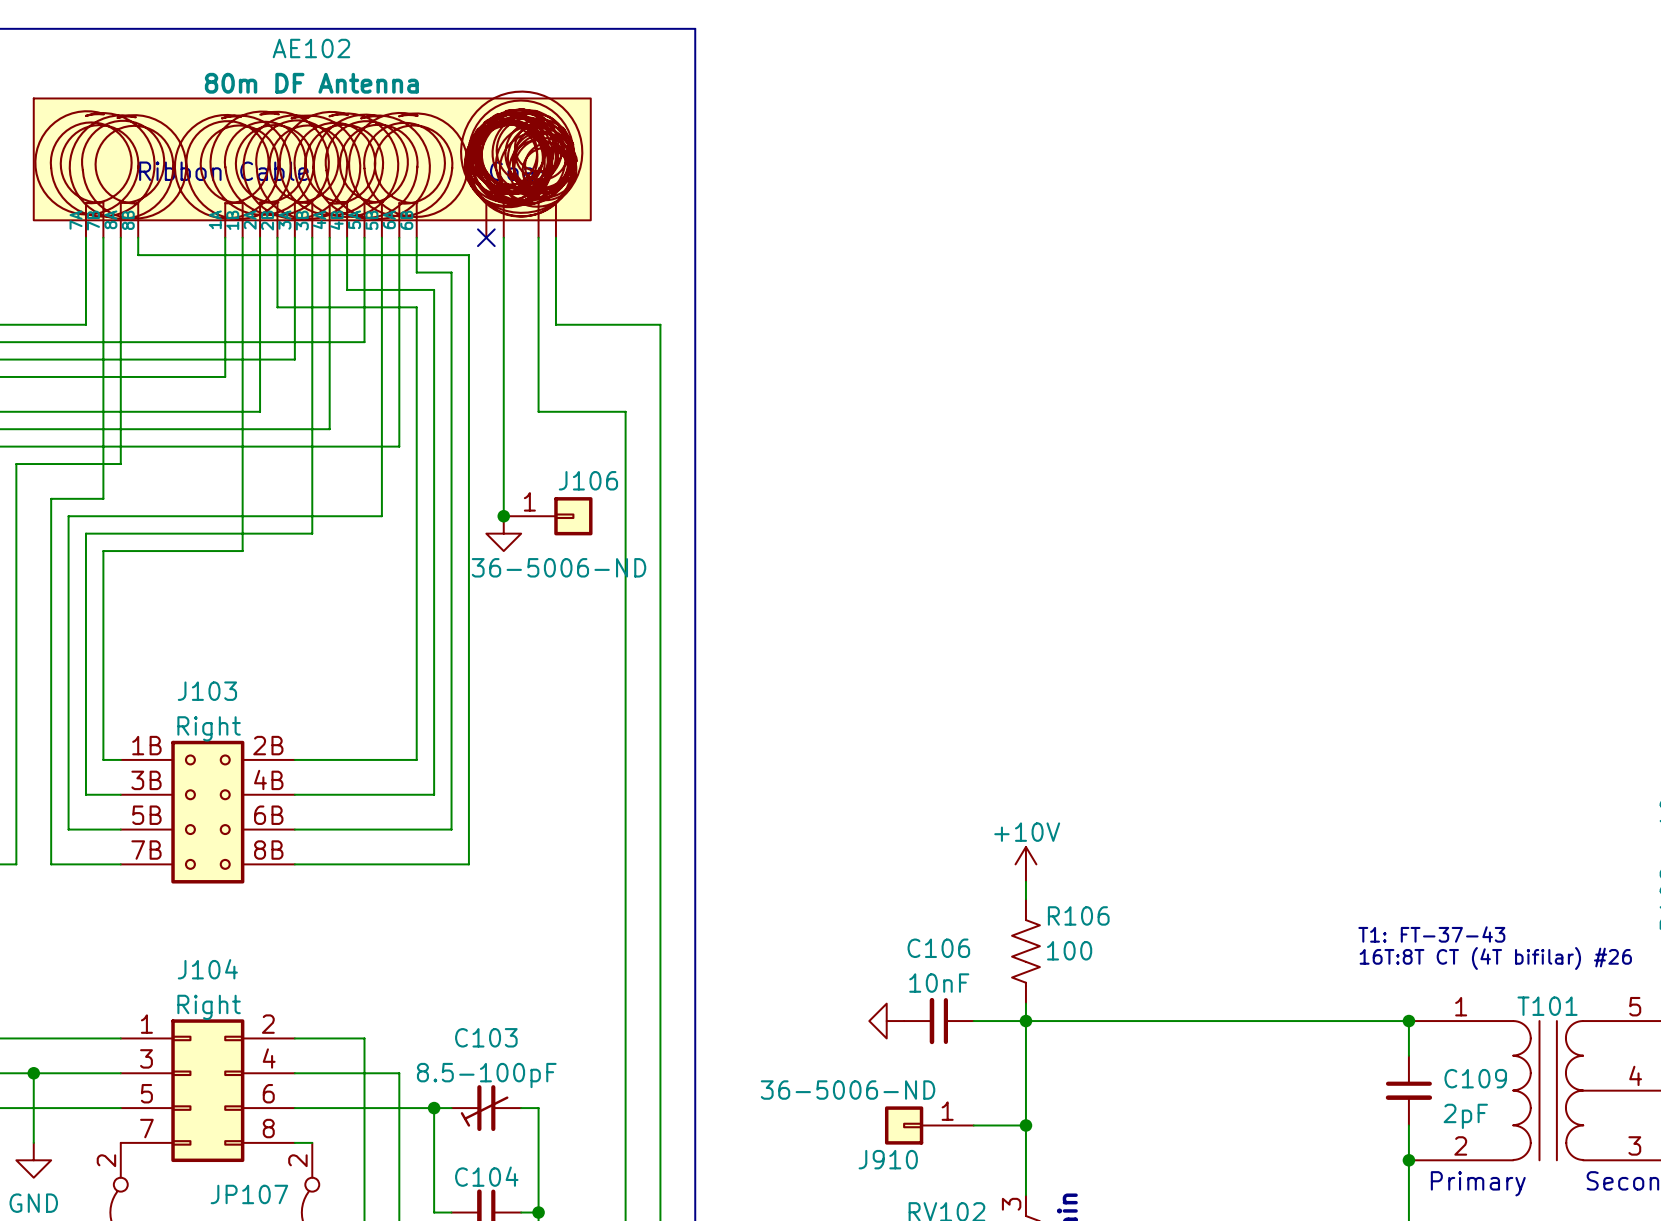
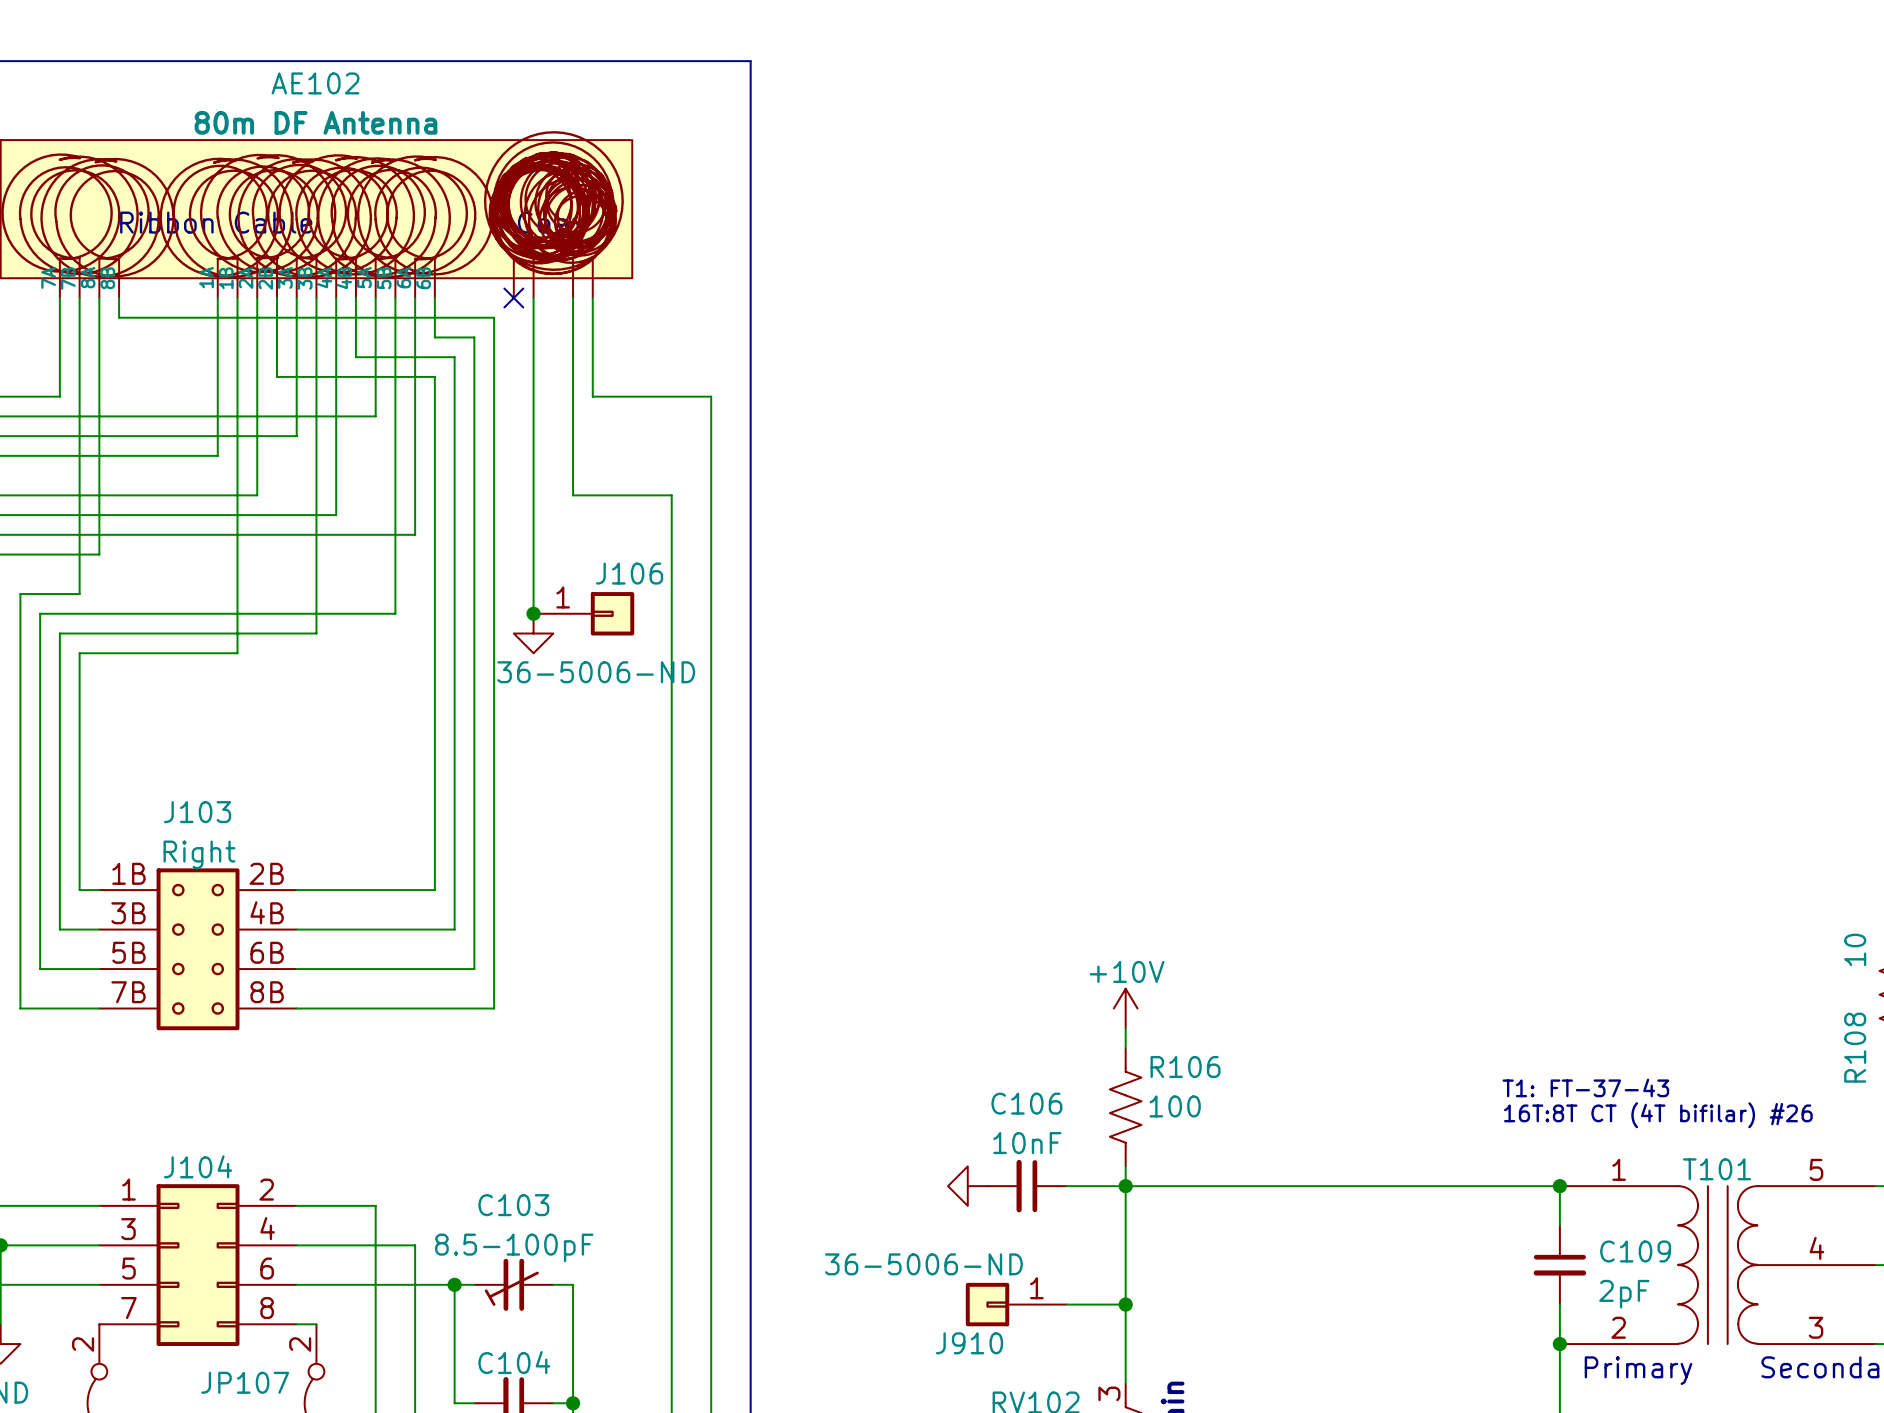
J104 name position: J104 (207, 969) -> J104 (198, 1166)
J104 value: Right (209, 1007) -> none

